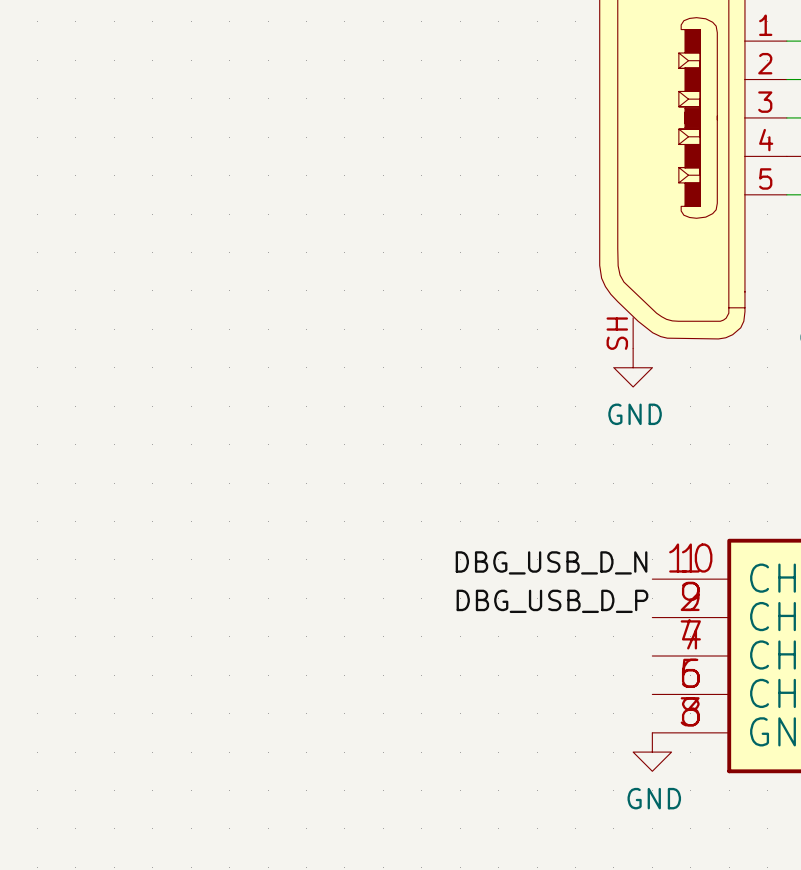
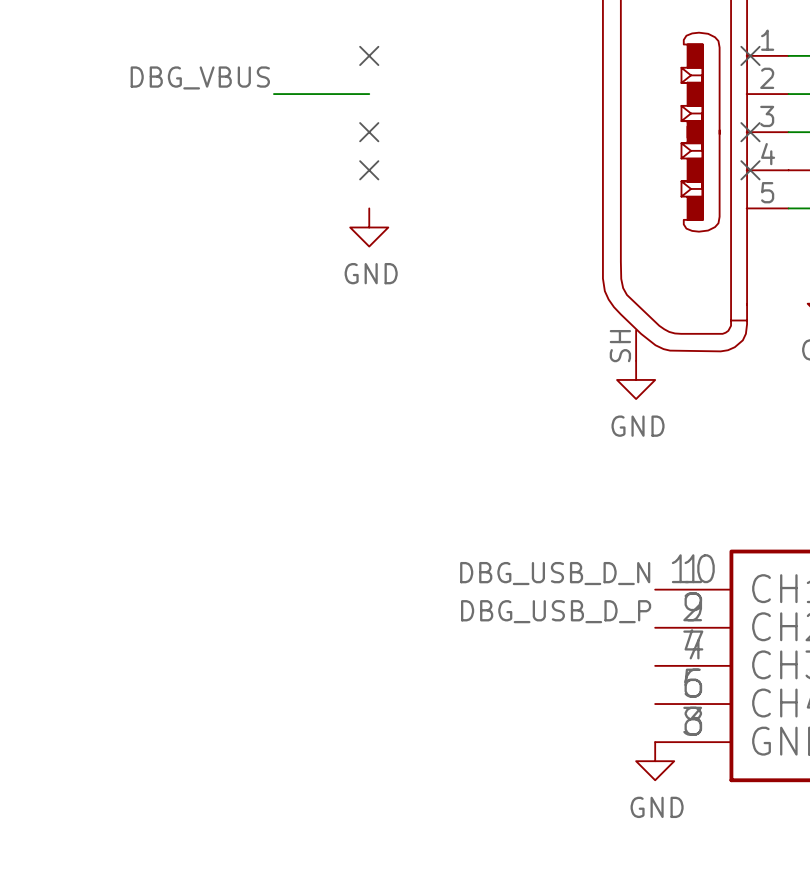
no-connect mark: none -> (369, 55)
no-connect mark: none -> (750, 55)
label: none -> DBG_VBUS (200, 77)
wire: none -> (273, 94) (369, 94)
no-connect mark: none -> (369, 132)
no-connect mark: none -> (750, 132)
no-connect mark: none -> (369, 170)
no-connect mark: none -> (750, 170)
power symbol: none -> GND (369, 227)

